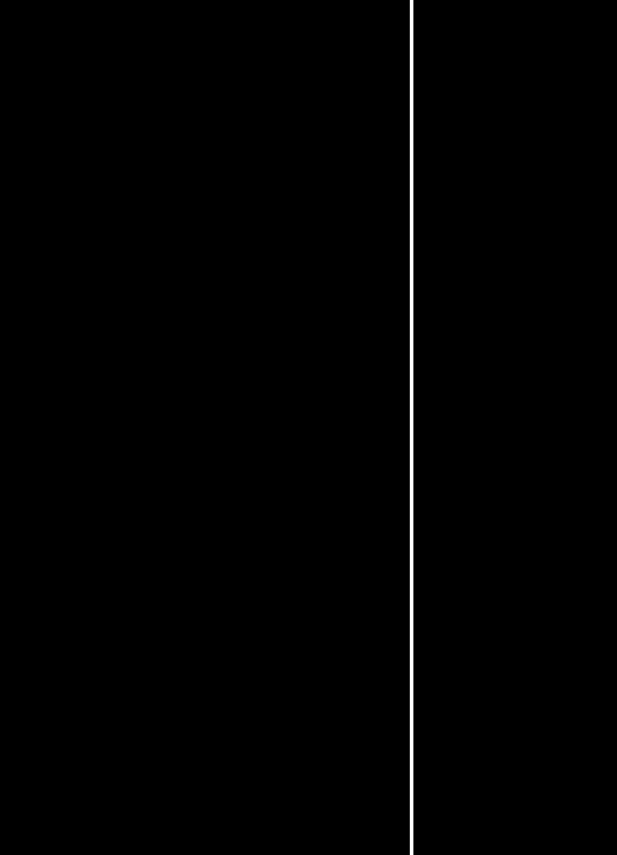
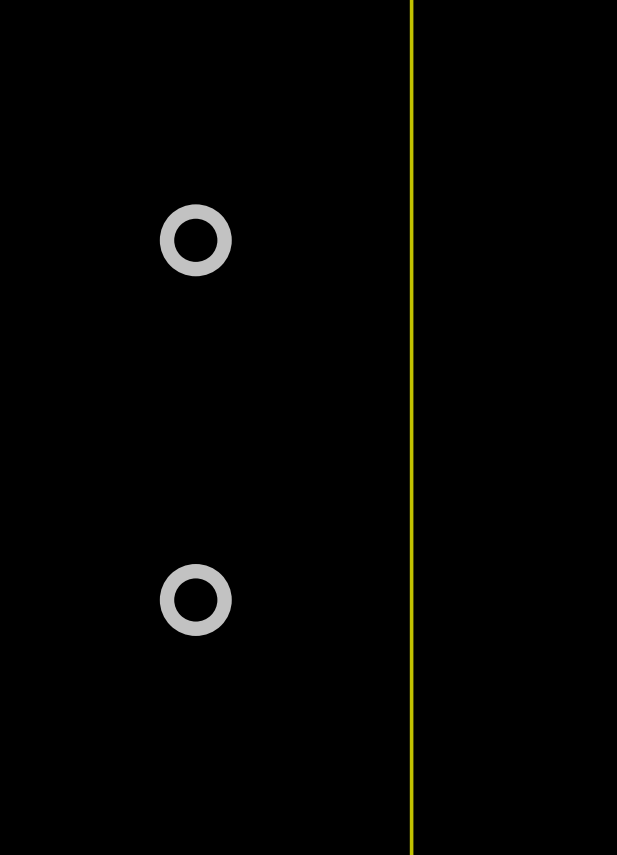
via: none -> (195, 240)
via: none -> (195, 599)

